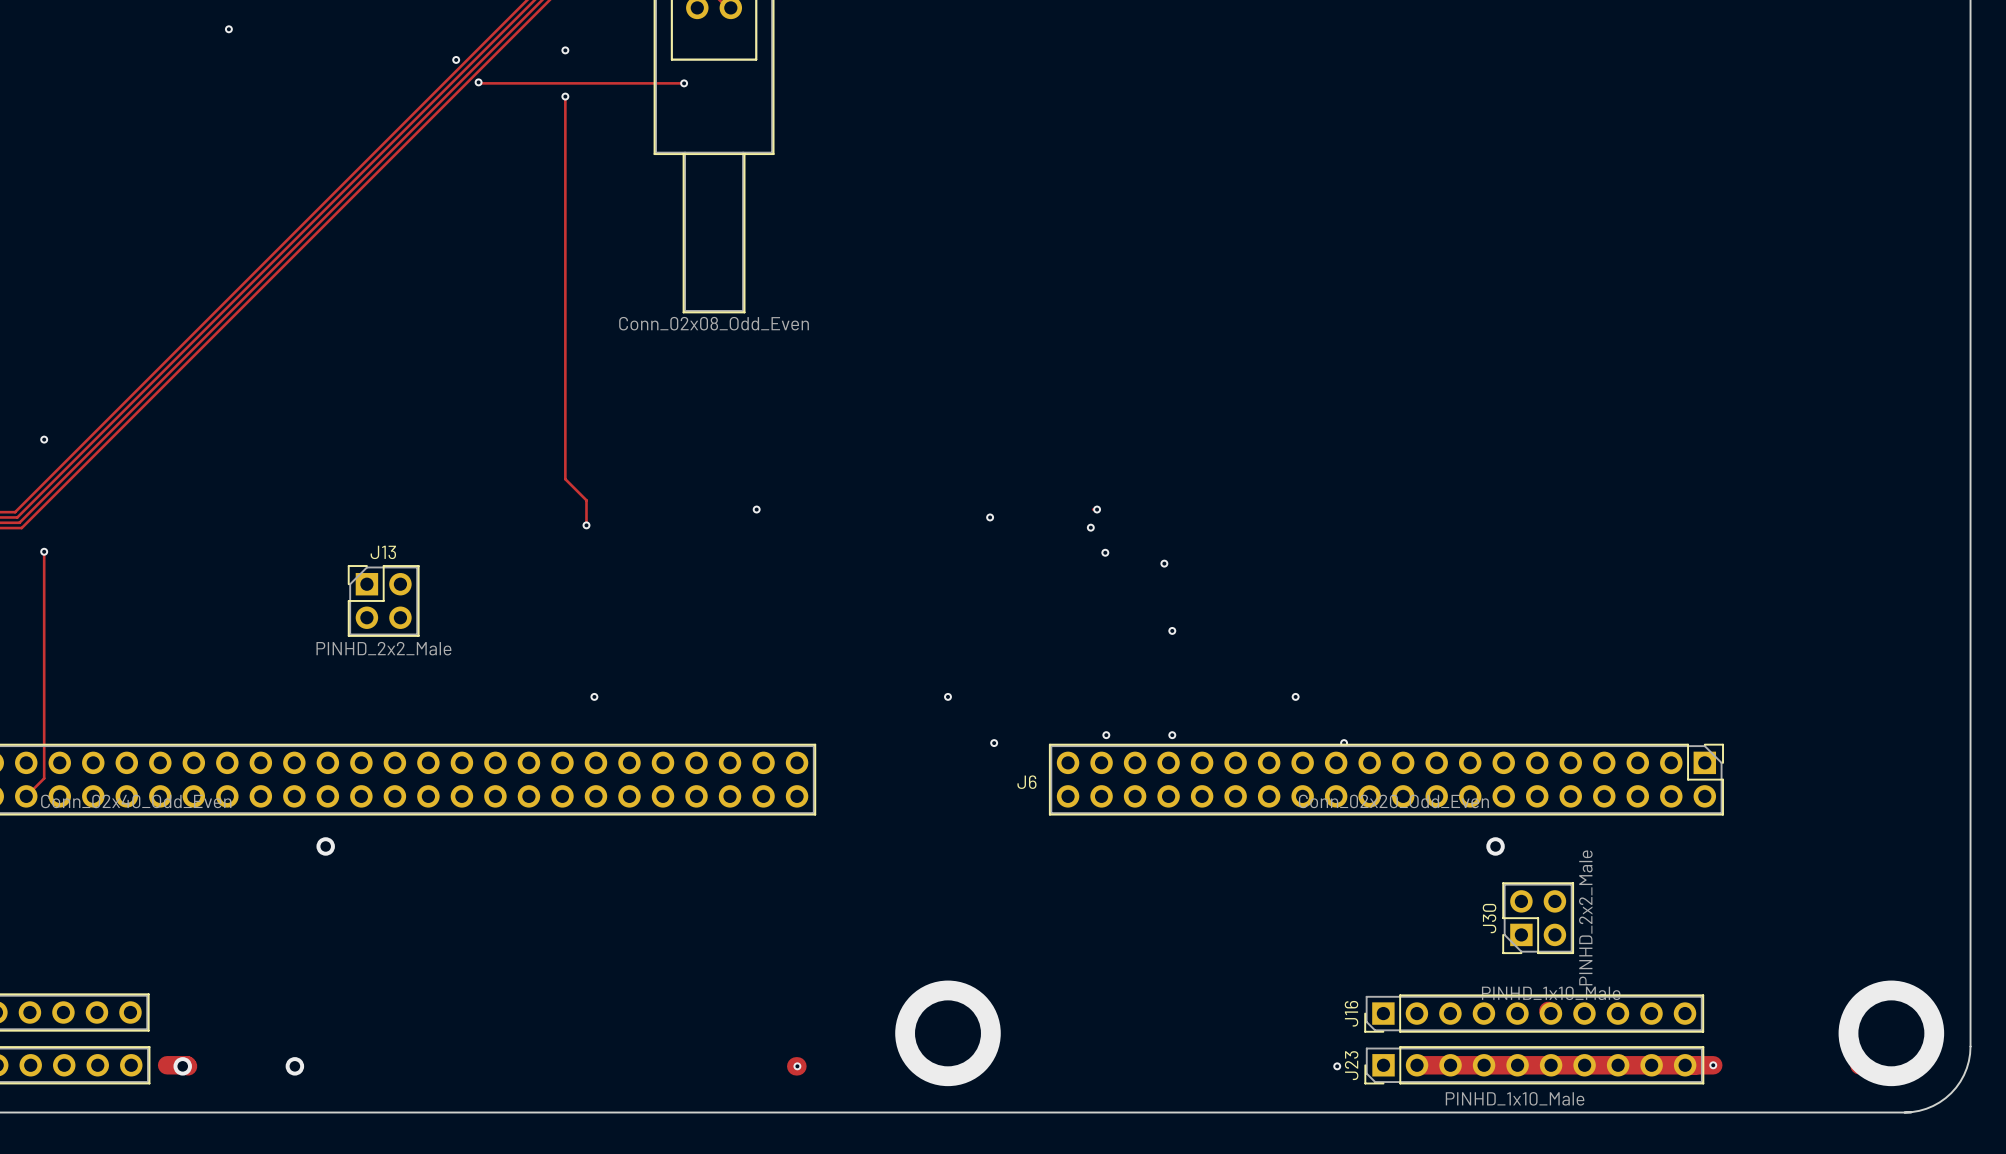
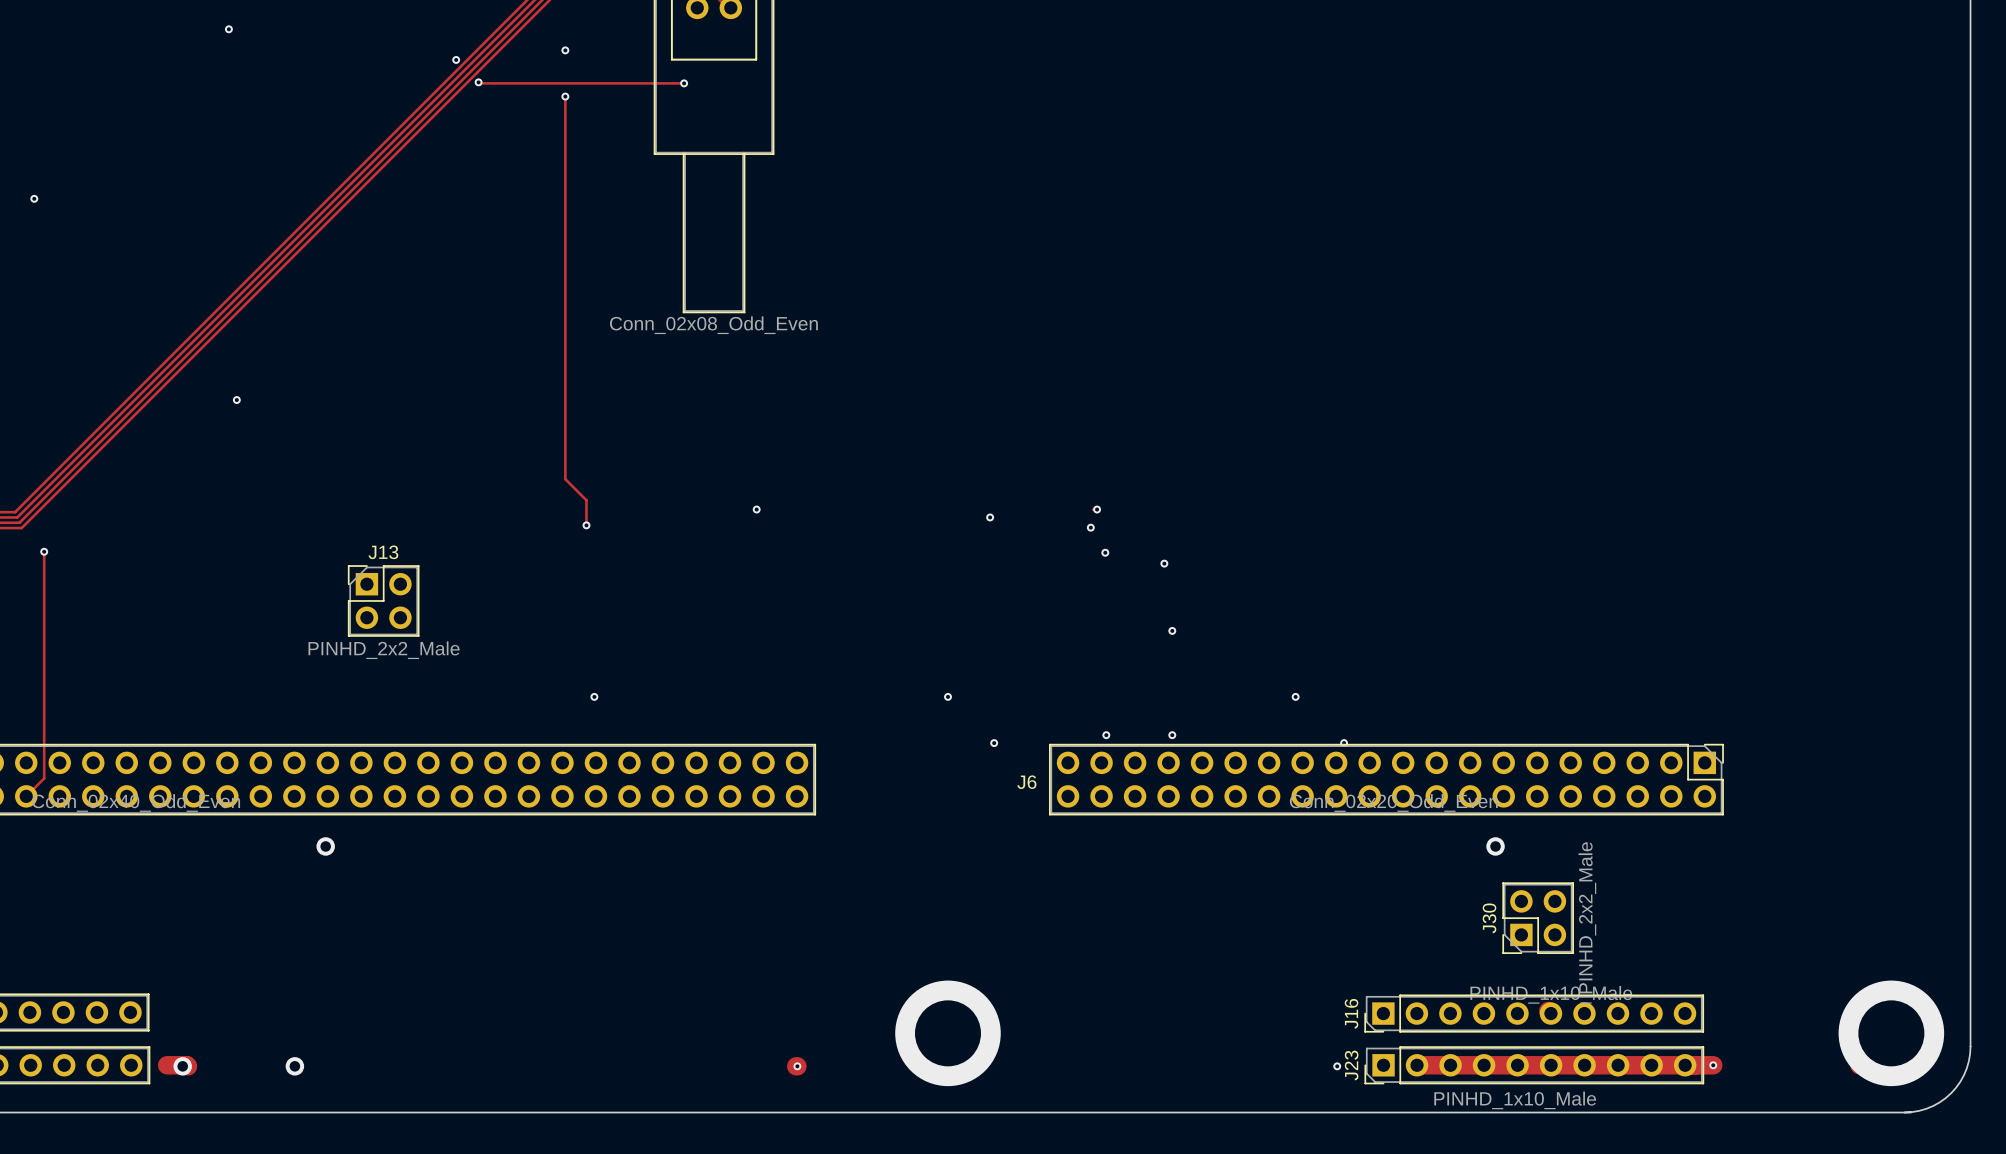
via: none -> (34, 198)
via: none -> (236, 400)
via: (44, 439) -> none

